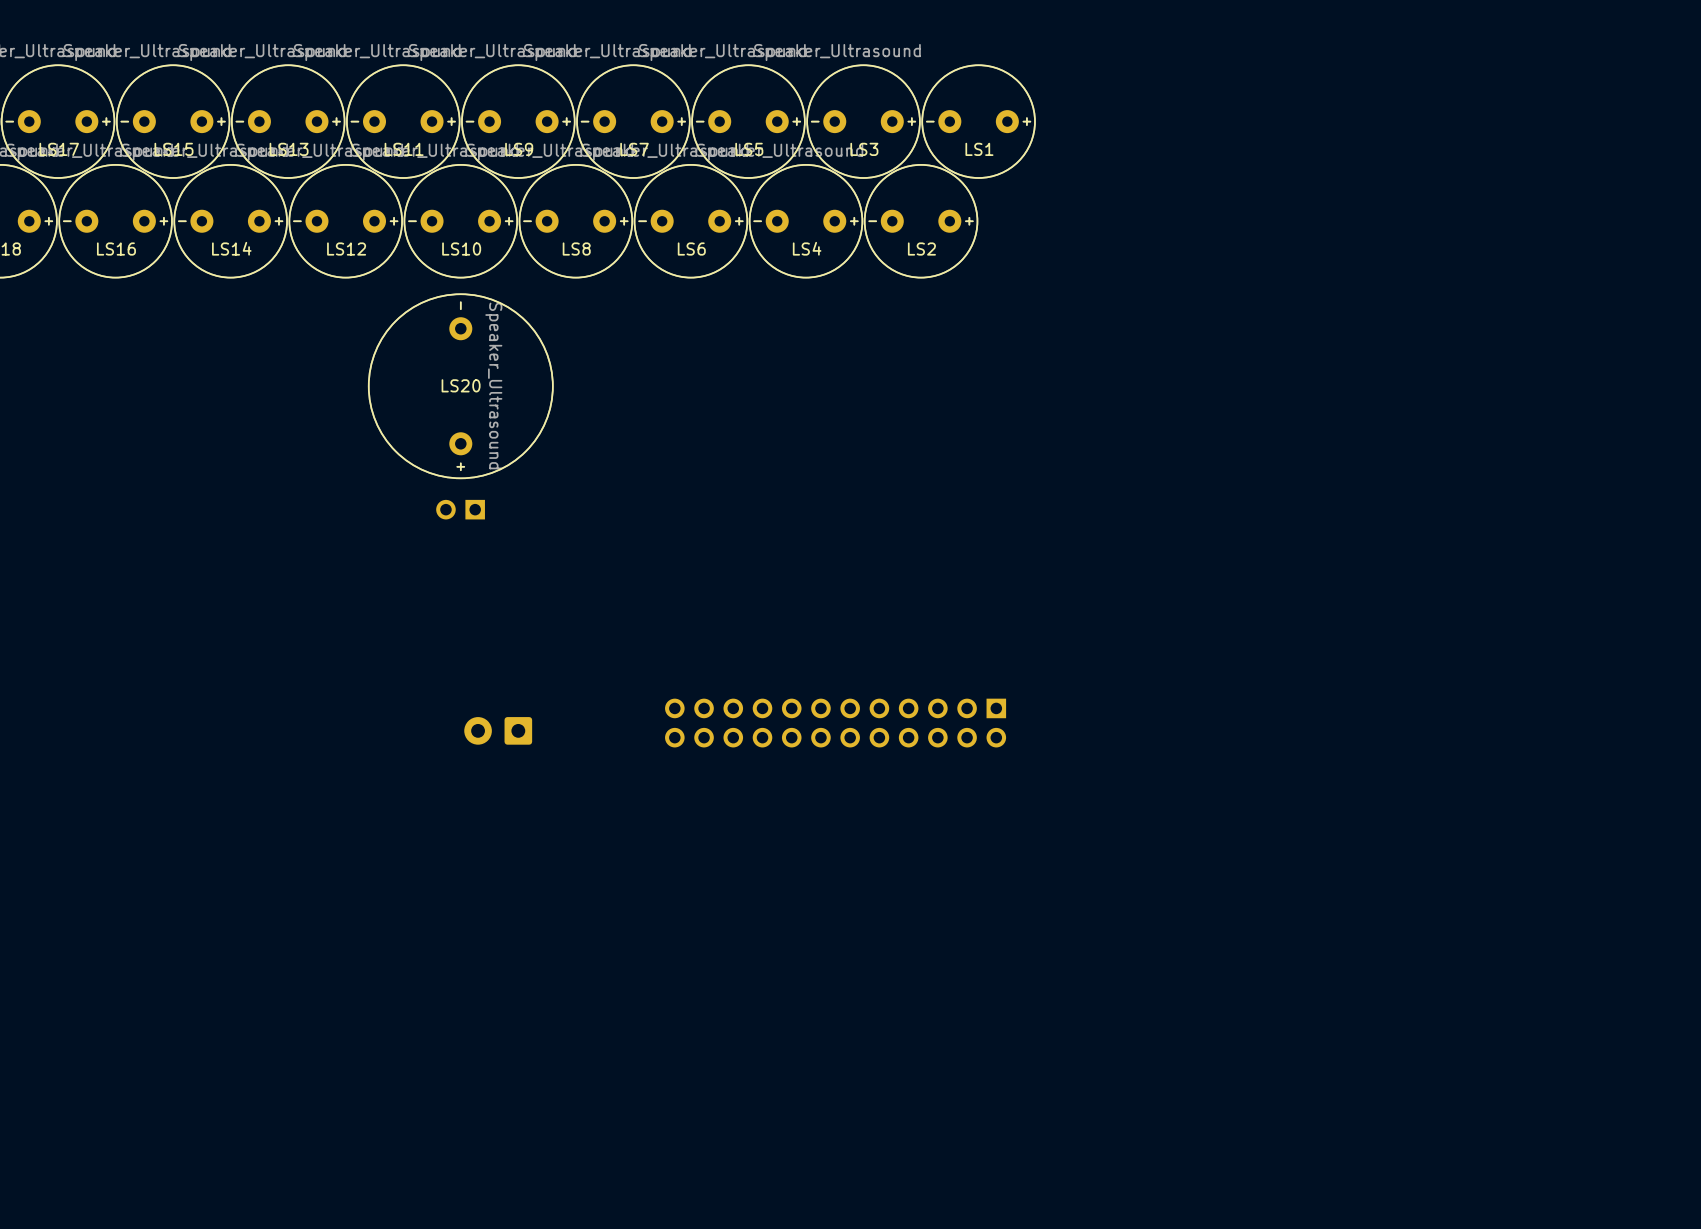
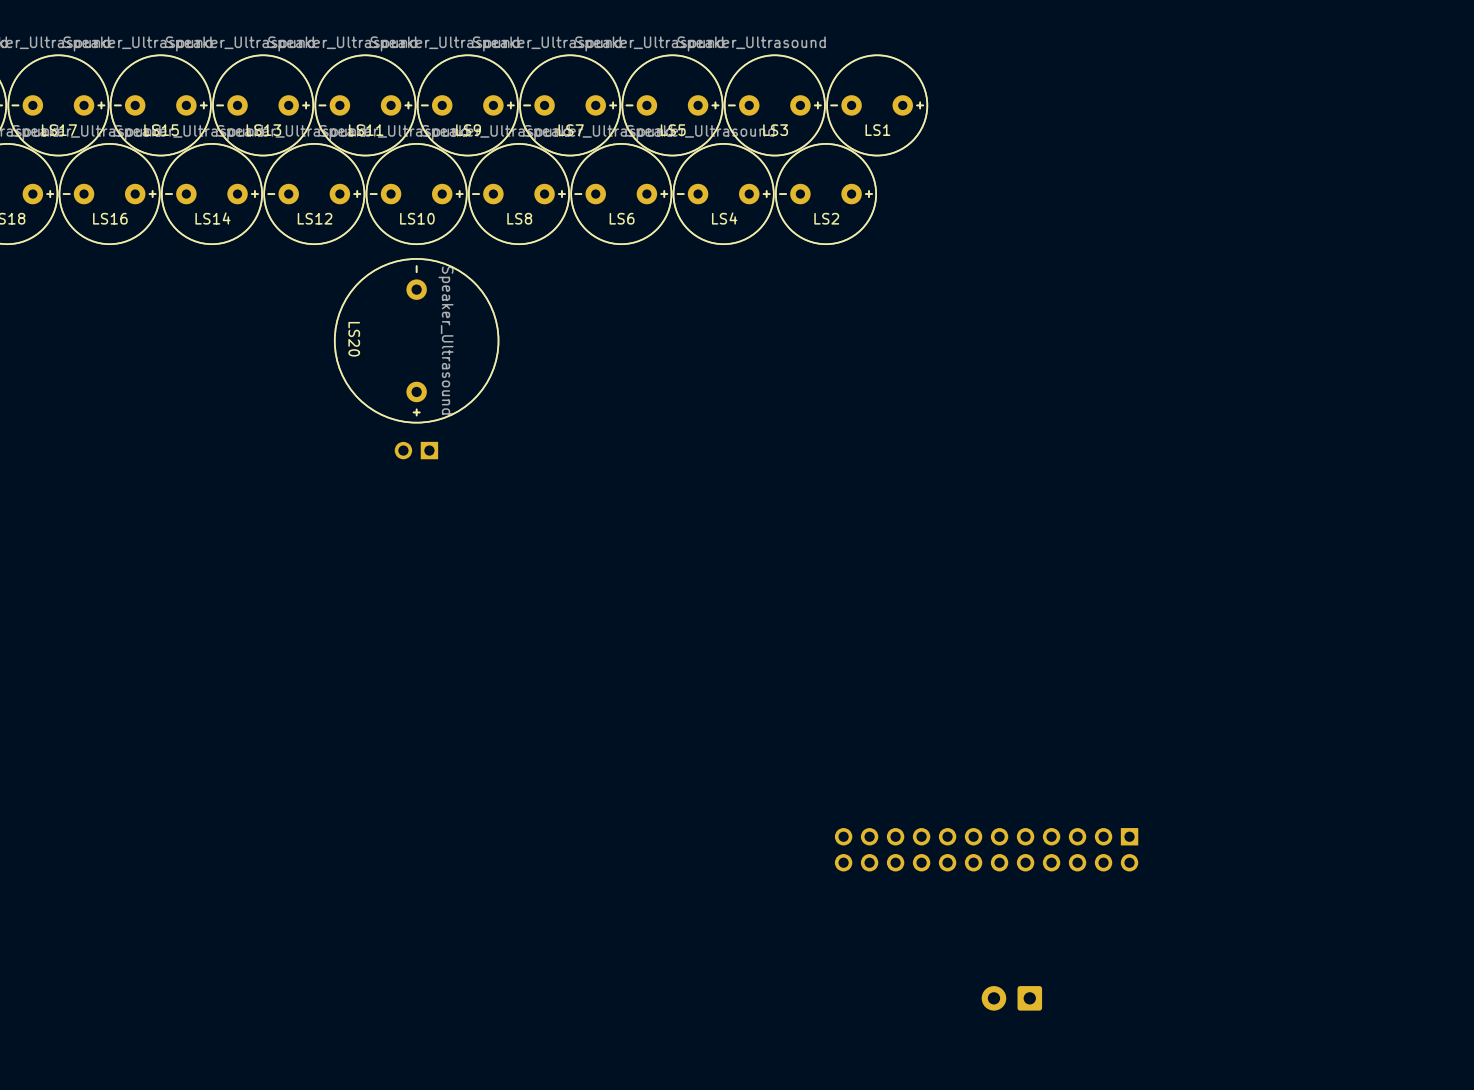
LS20 name rotation: 0° (461, 385) -> 90° clockwise (354, 339)
LS20 name position: LS20 (461, 385) -> LS20 (354, 339)
part: (835, 723) -> none
part: (498, 730) -> none
part: none -> (986, 849)
part: none -> (1011, 998)

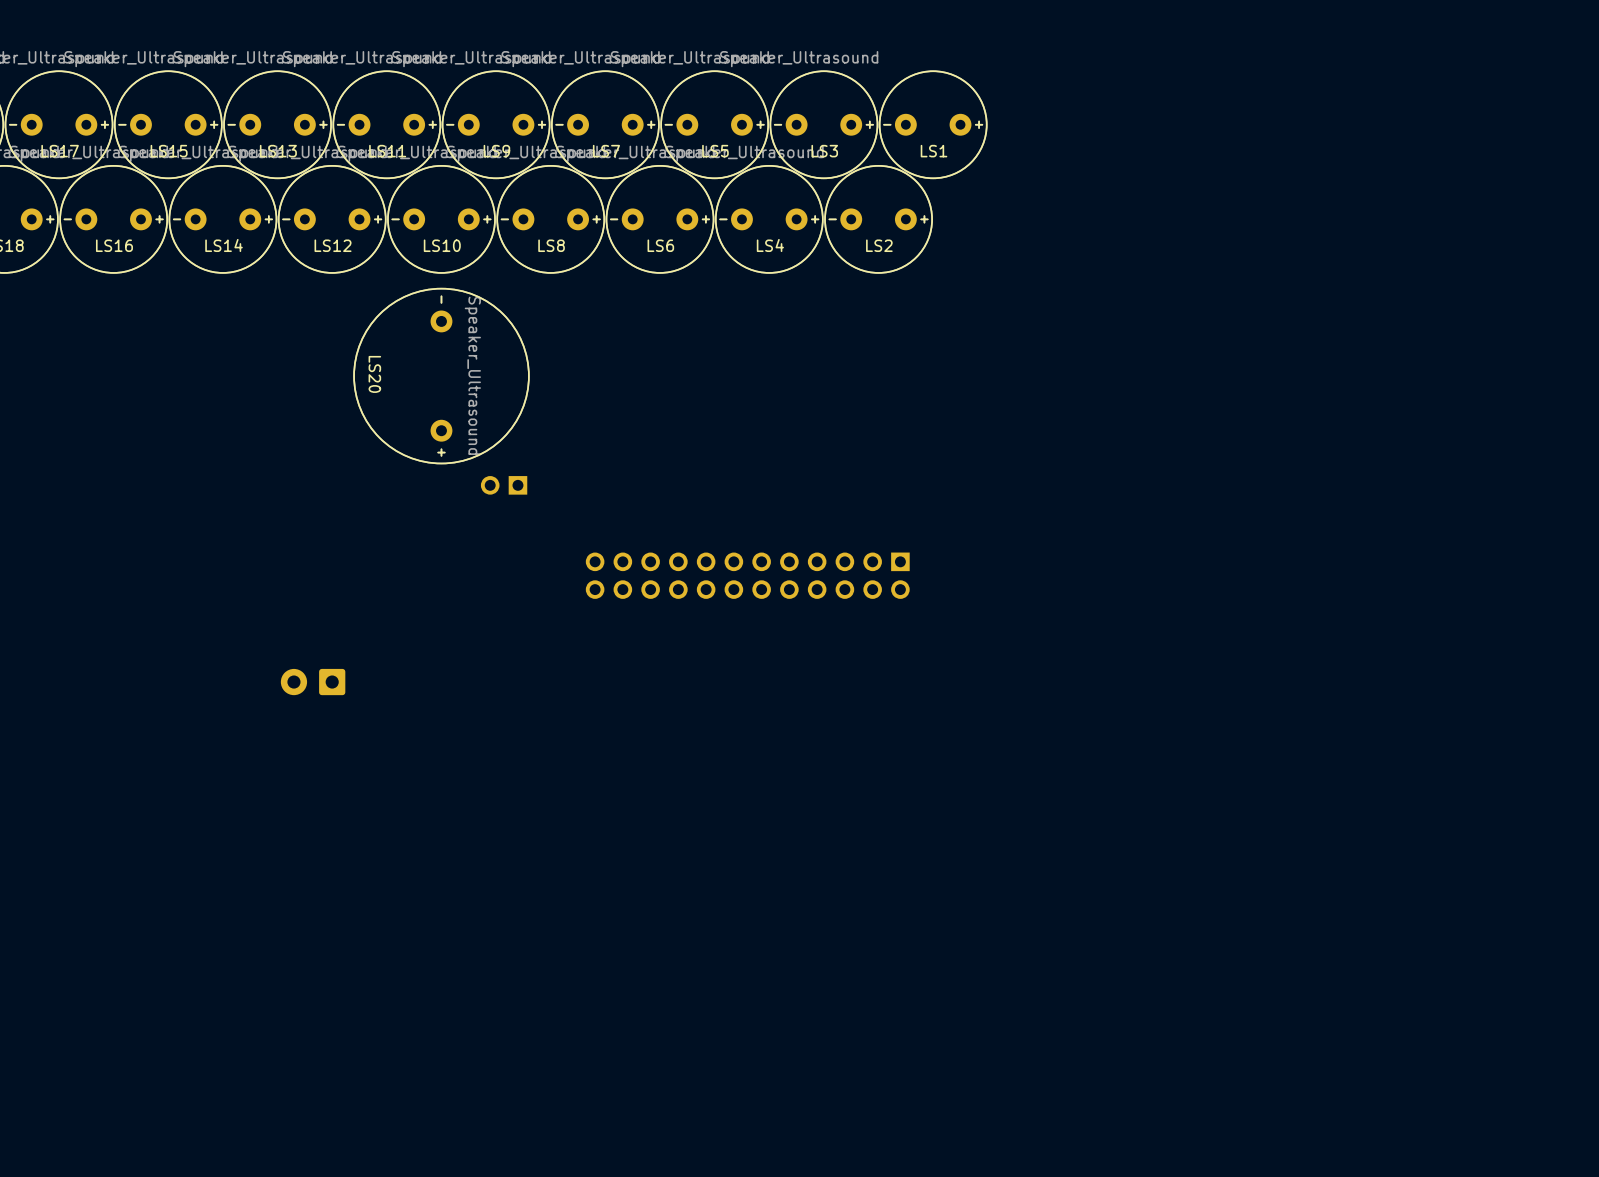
part position: (416, 450) -> (504, 485)
part: none -> (747, 575)
part: none -> (313, 682)
part: (986, 849) -> none
part: (1011, 998) -> none

